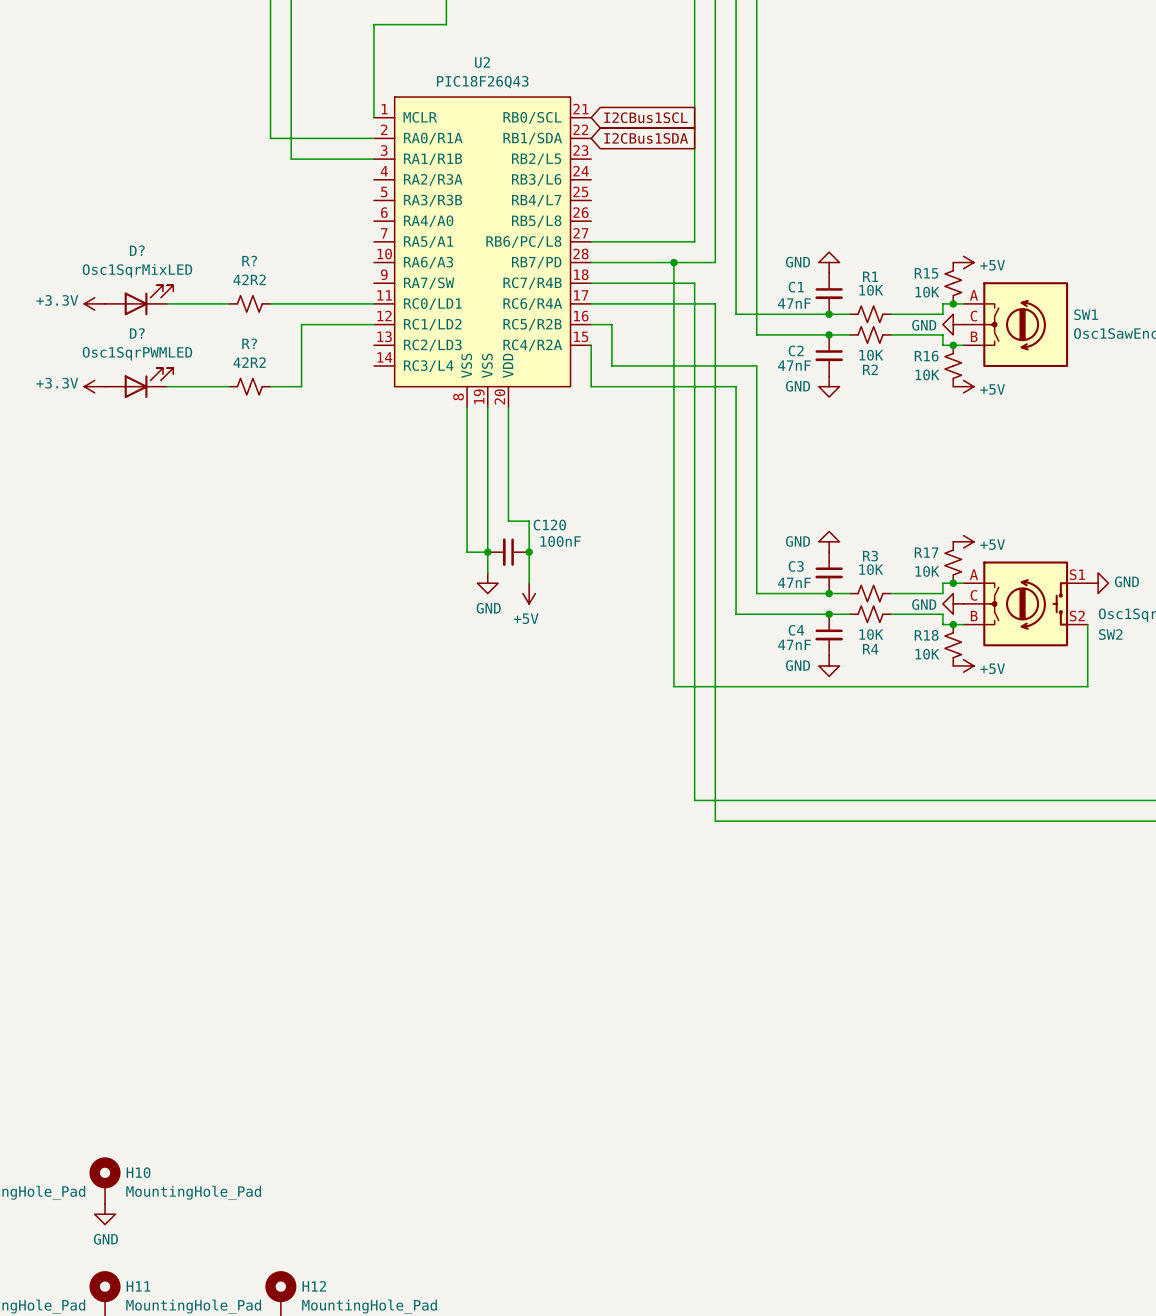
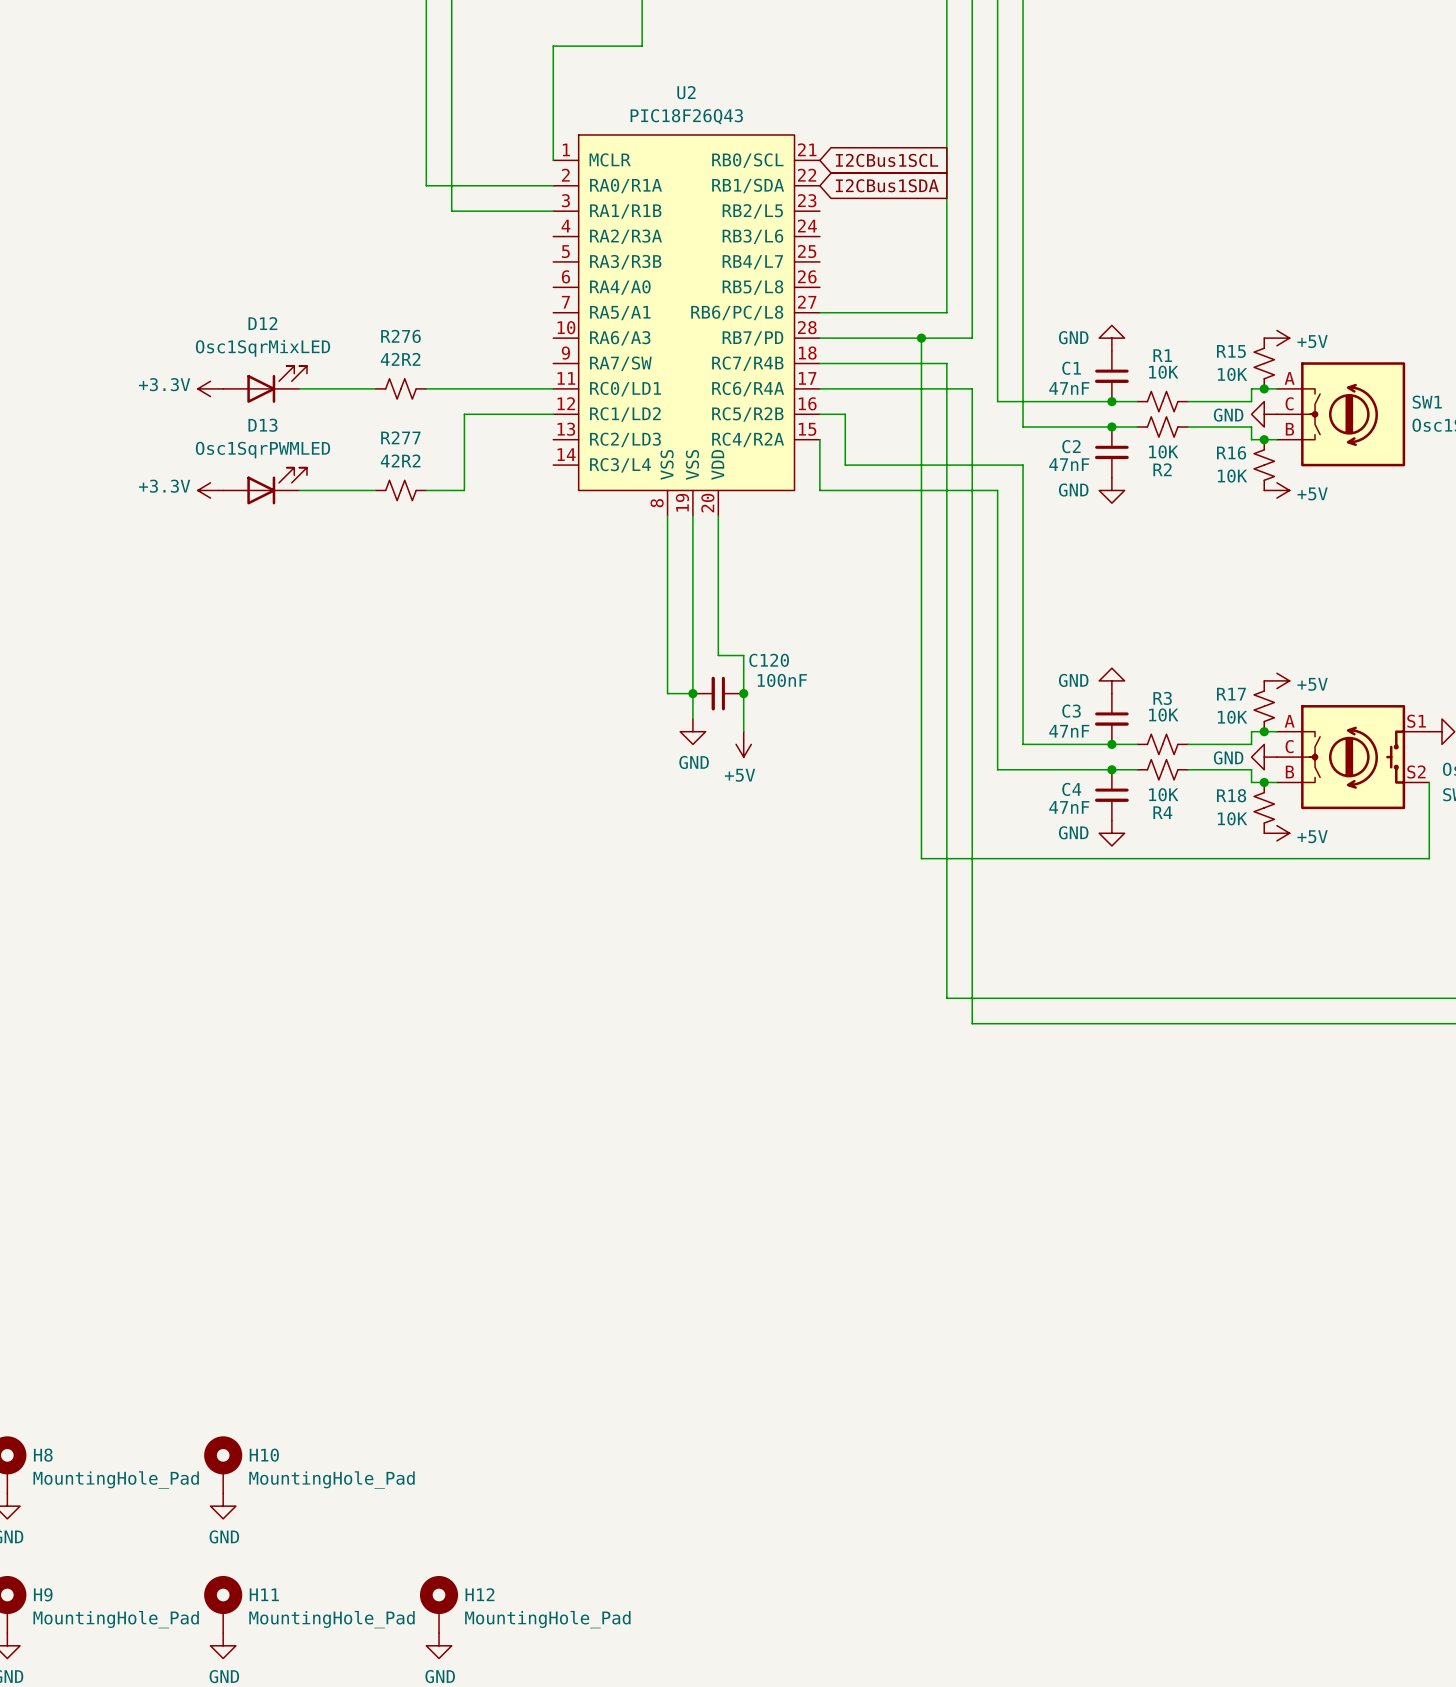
D? name: D? (137, 250) -> D12 (262, 323)
R? name: R? (249, 261) -> R276 (400, 336)
D? name: D? (137, 333) -> D13 (262, 425)
R? name: R? (249, 343) -> R277 (400, 437)

